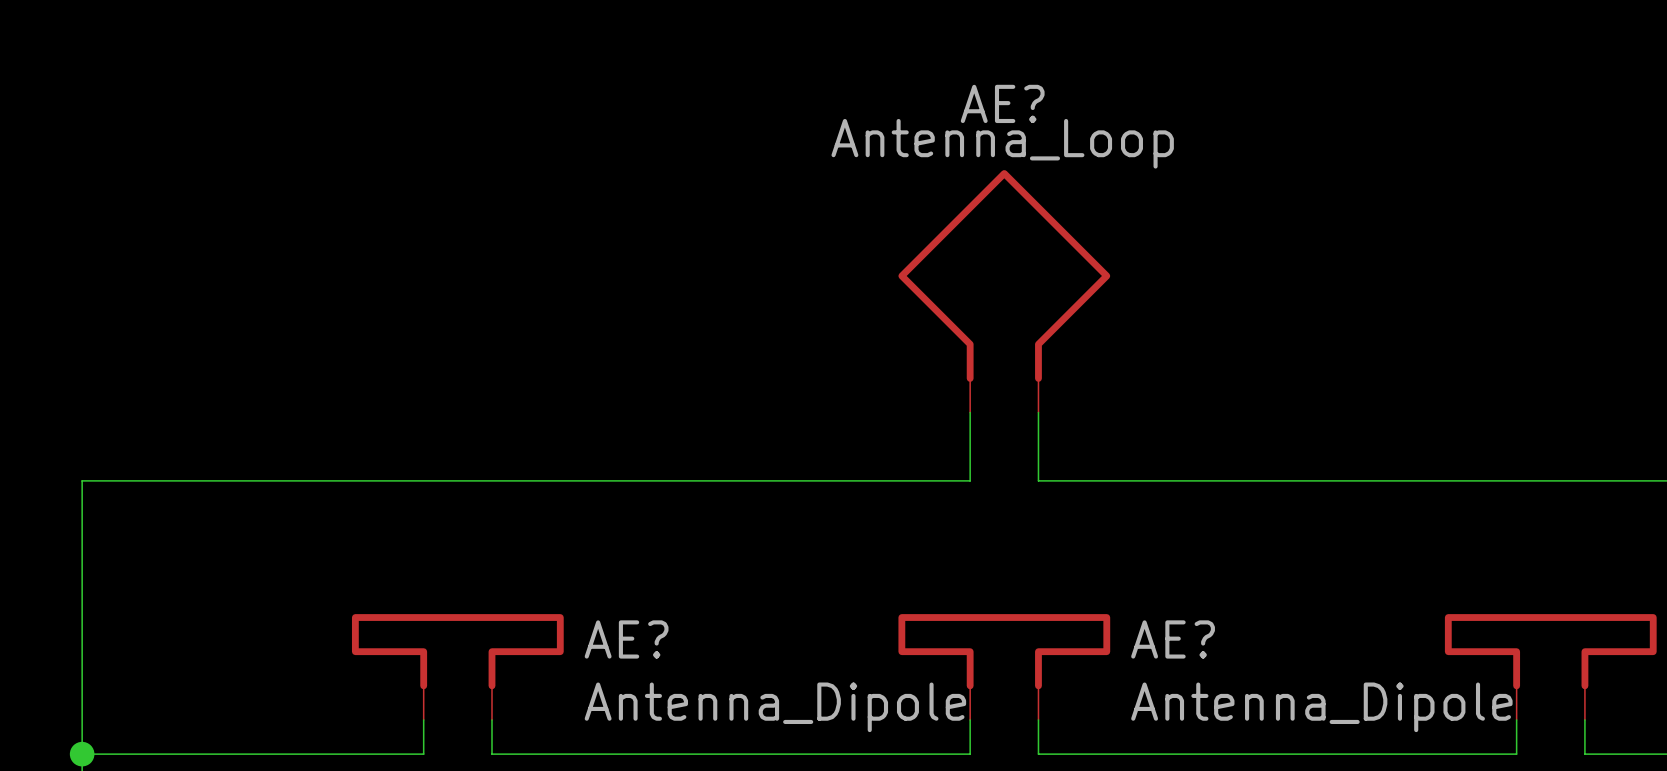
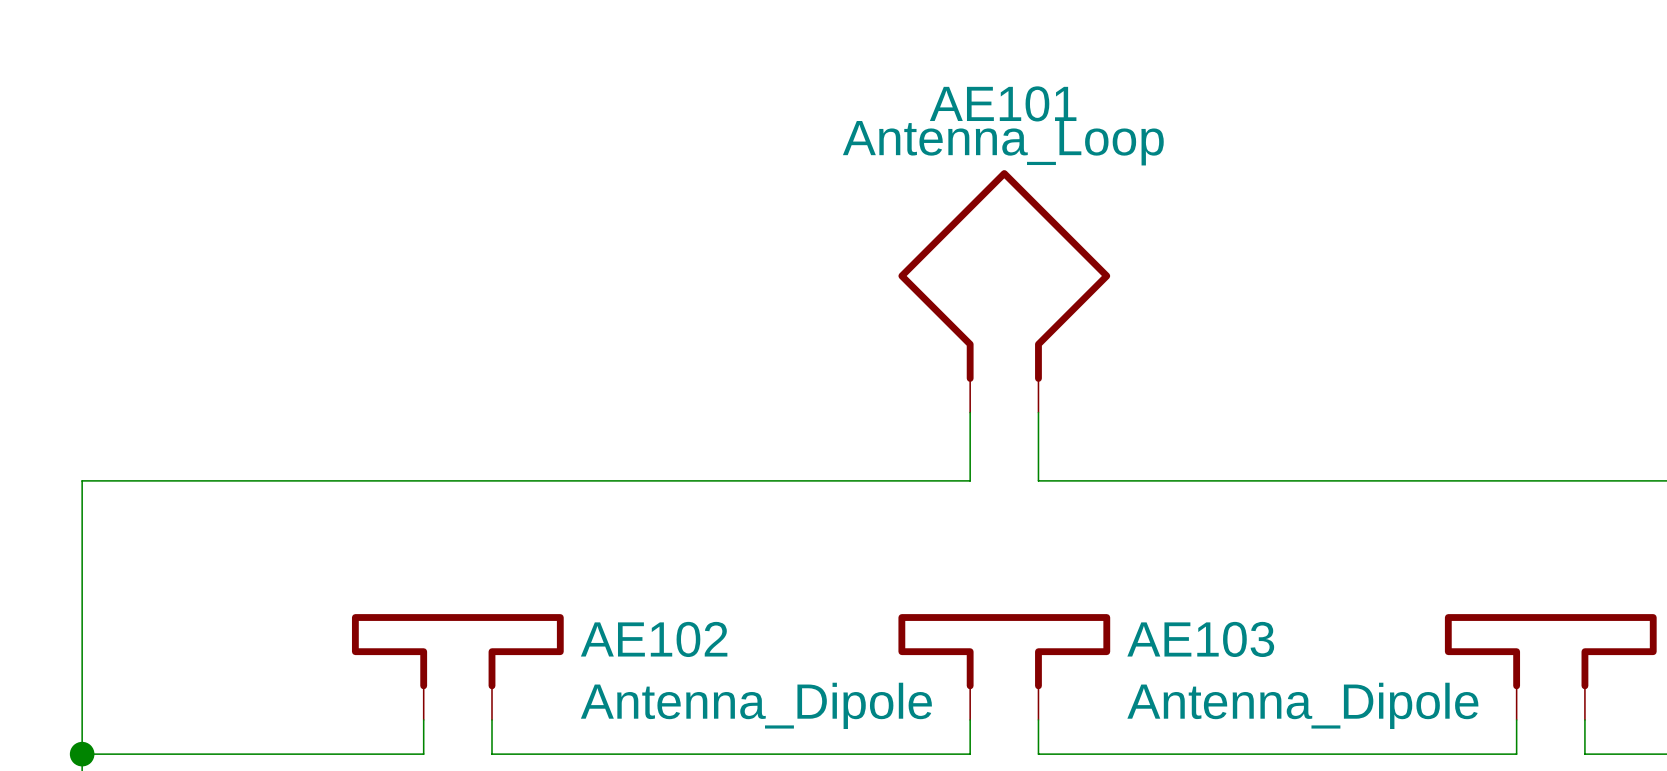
AE? name: AE? (1002, 103) -> AE101 (1003, 103)
AE? name: AE? (626, 639) -> AE102 (654, 639)
AE? name: AE? (1173, 639) -> AE103 (1200, 639)

